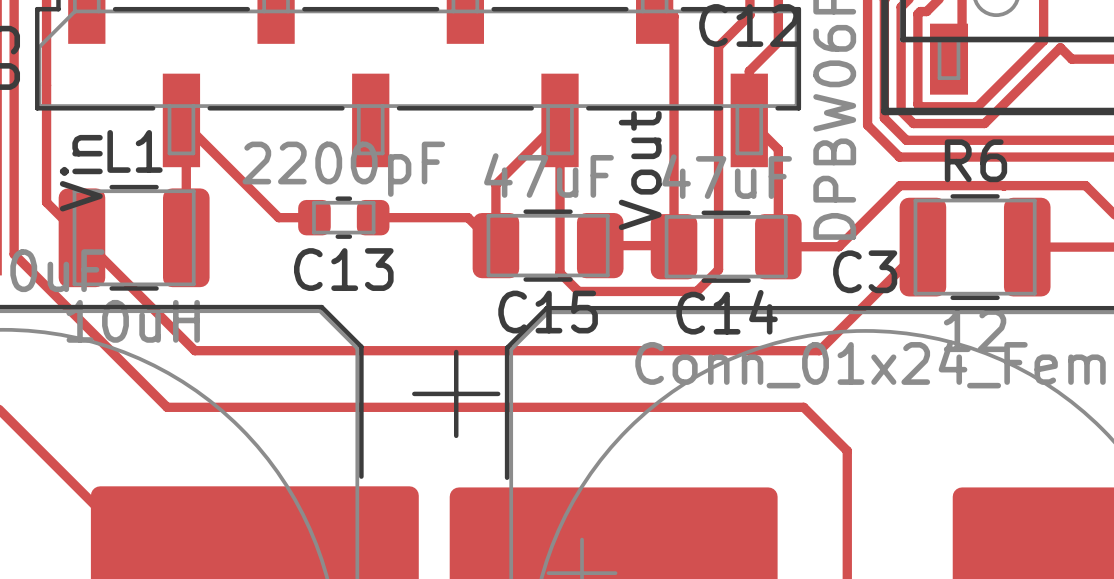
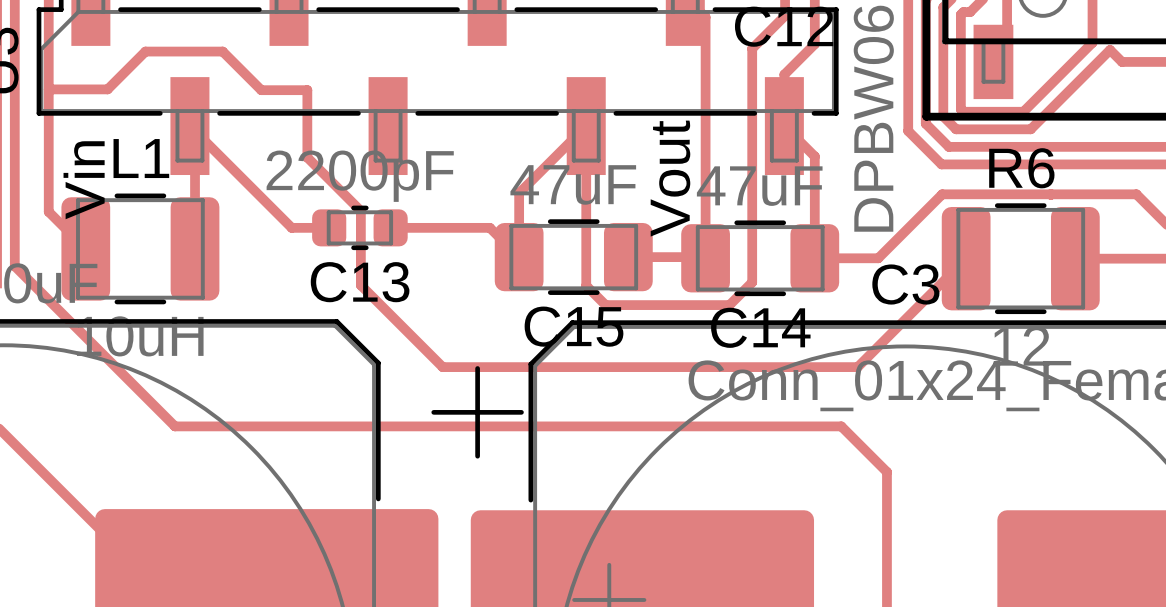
track: (81, 237) (194, 350) (422, 350) -> (48, 89) (107, 89) (145, 51) (222, 51) (261, 90) (307, 90) (307, 157) (360, 211) (360, 285) (442, 367)

